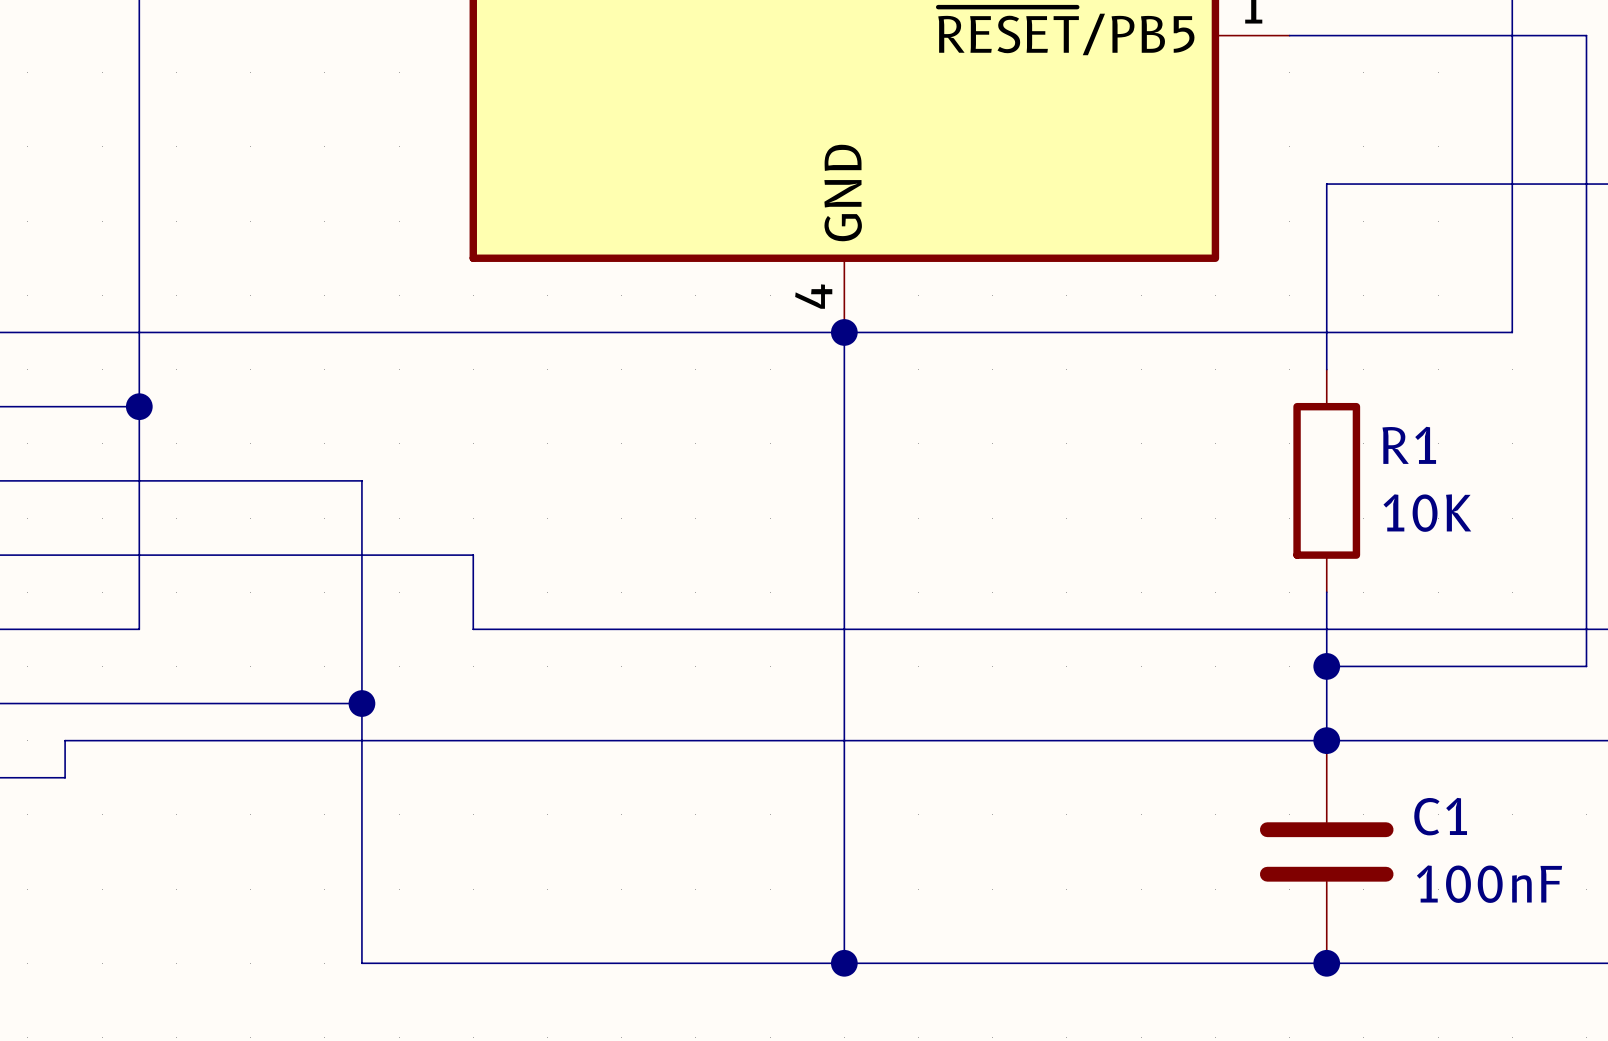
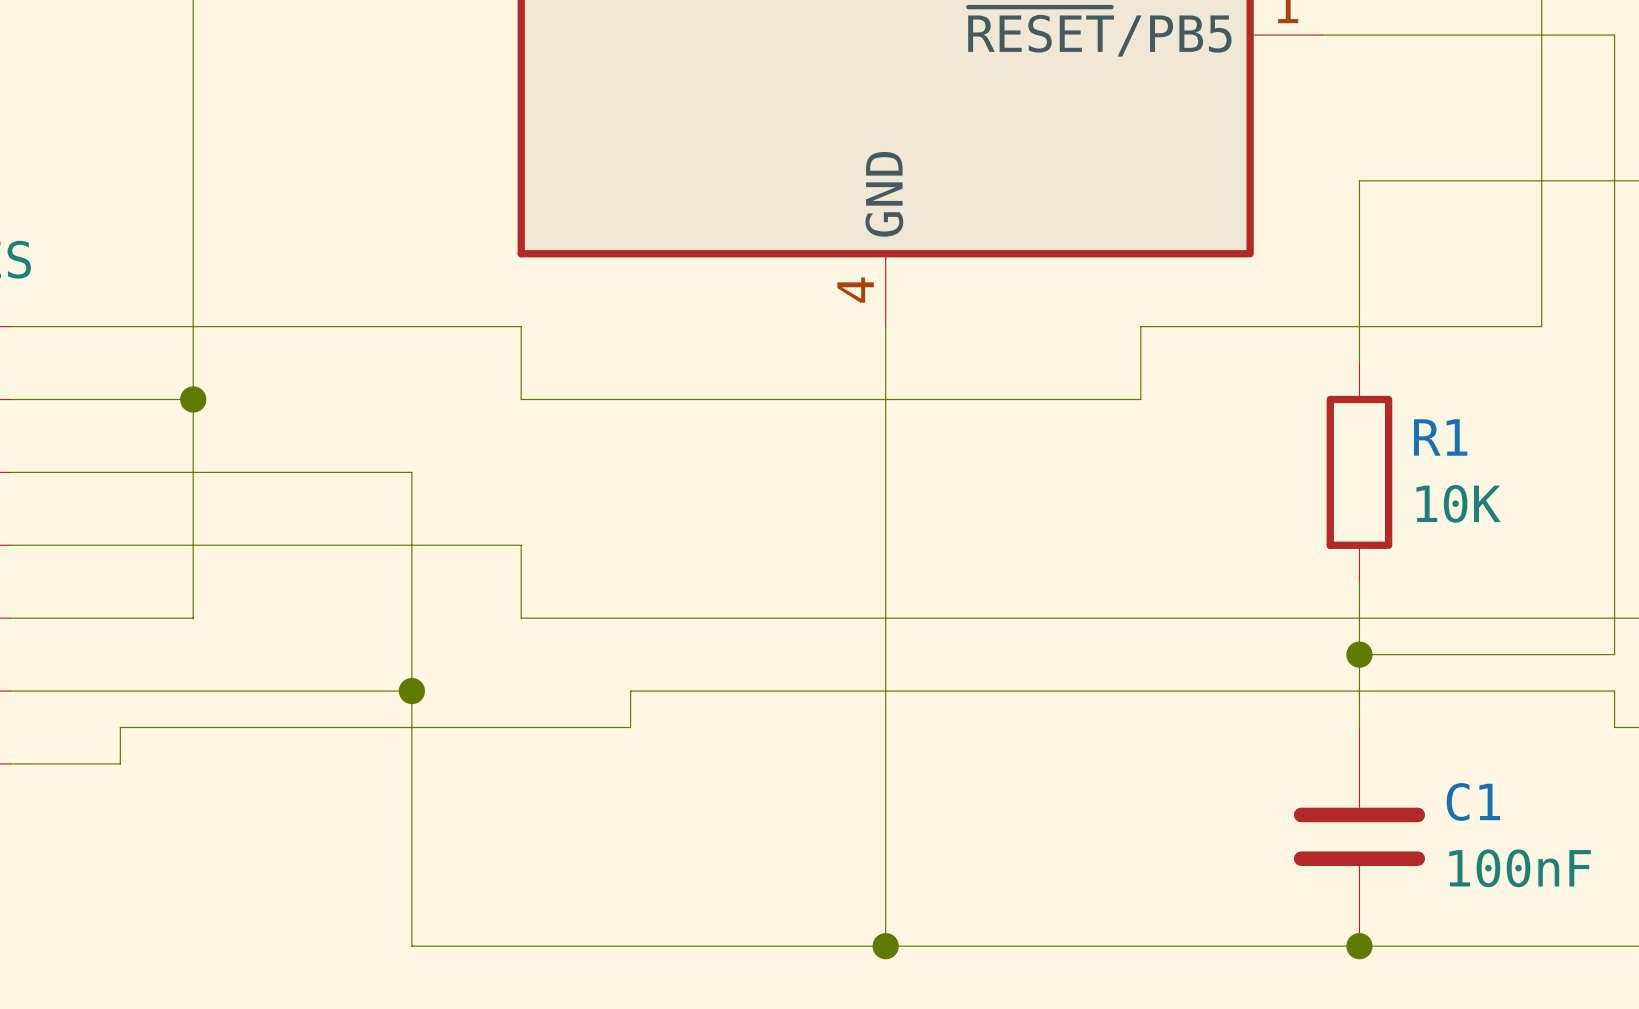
wire: (473, 332) (1104, 332) -> (521, 326) (521, 399) (1140, 399) (1140, 326)
junction: (844, 332) -> none
wire: (584, 740) (1586, 740) -> (630, 727) (630, 691) (1614, 691) (1614, 727)
junction: (1326, 740) -> none

